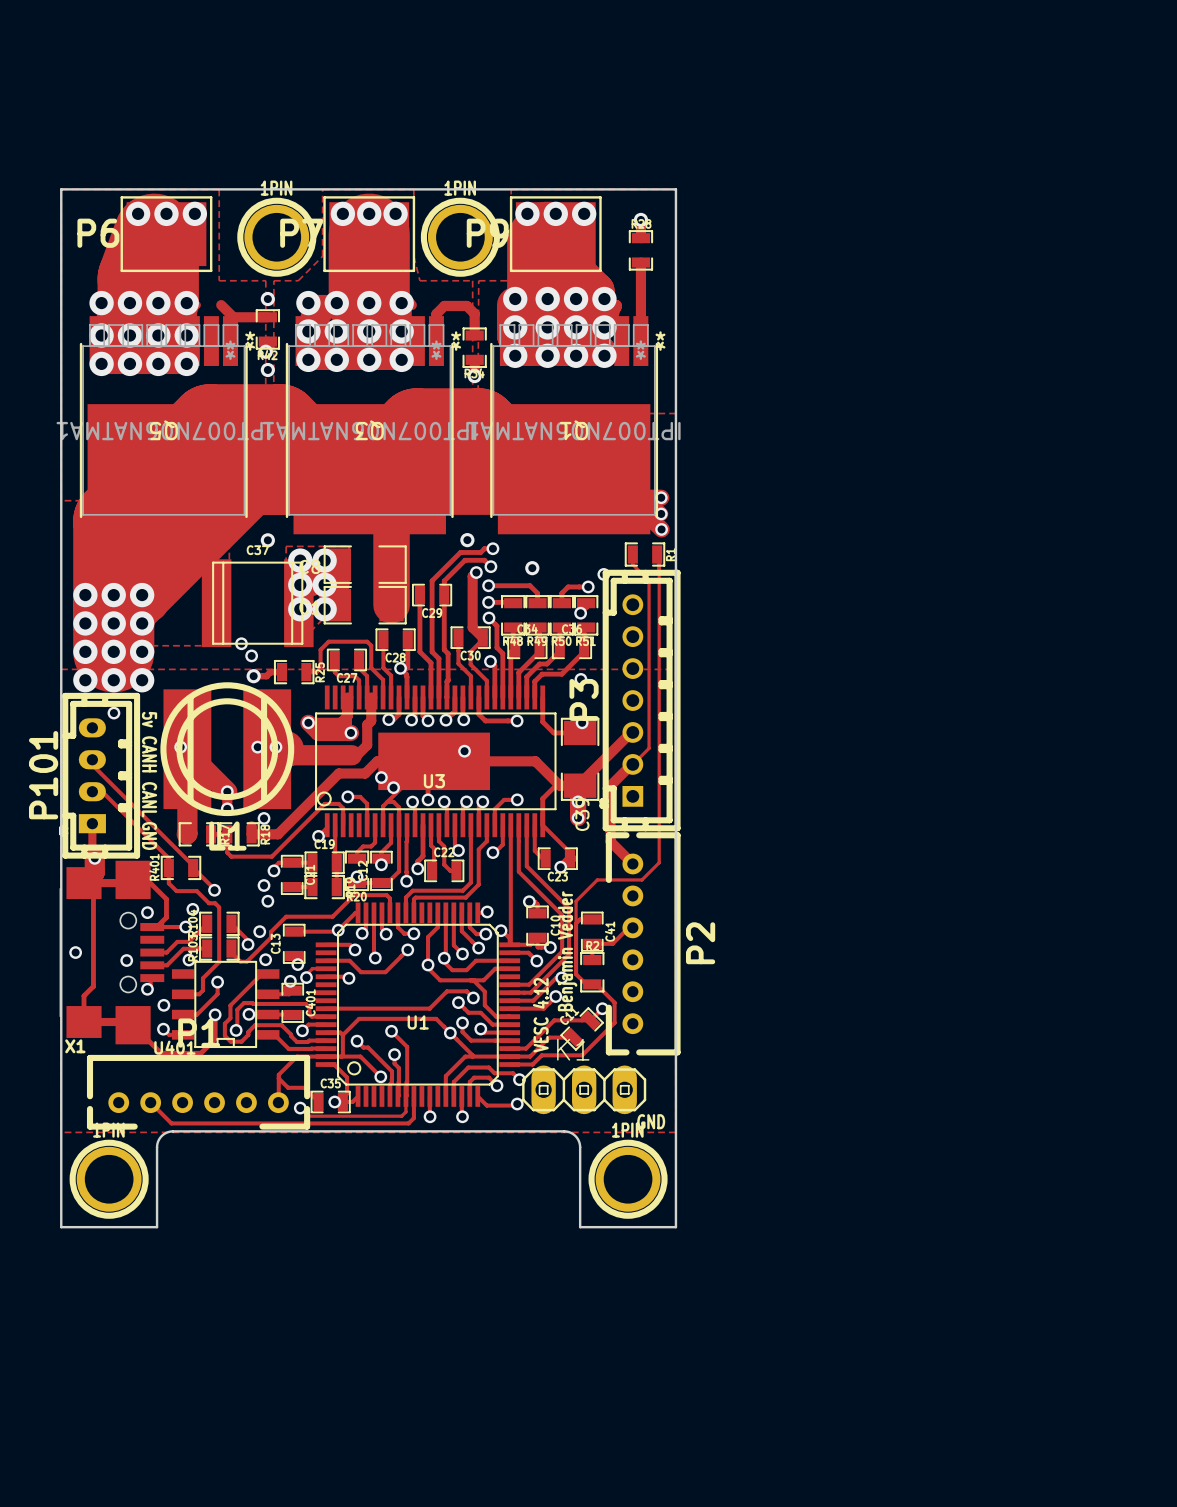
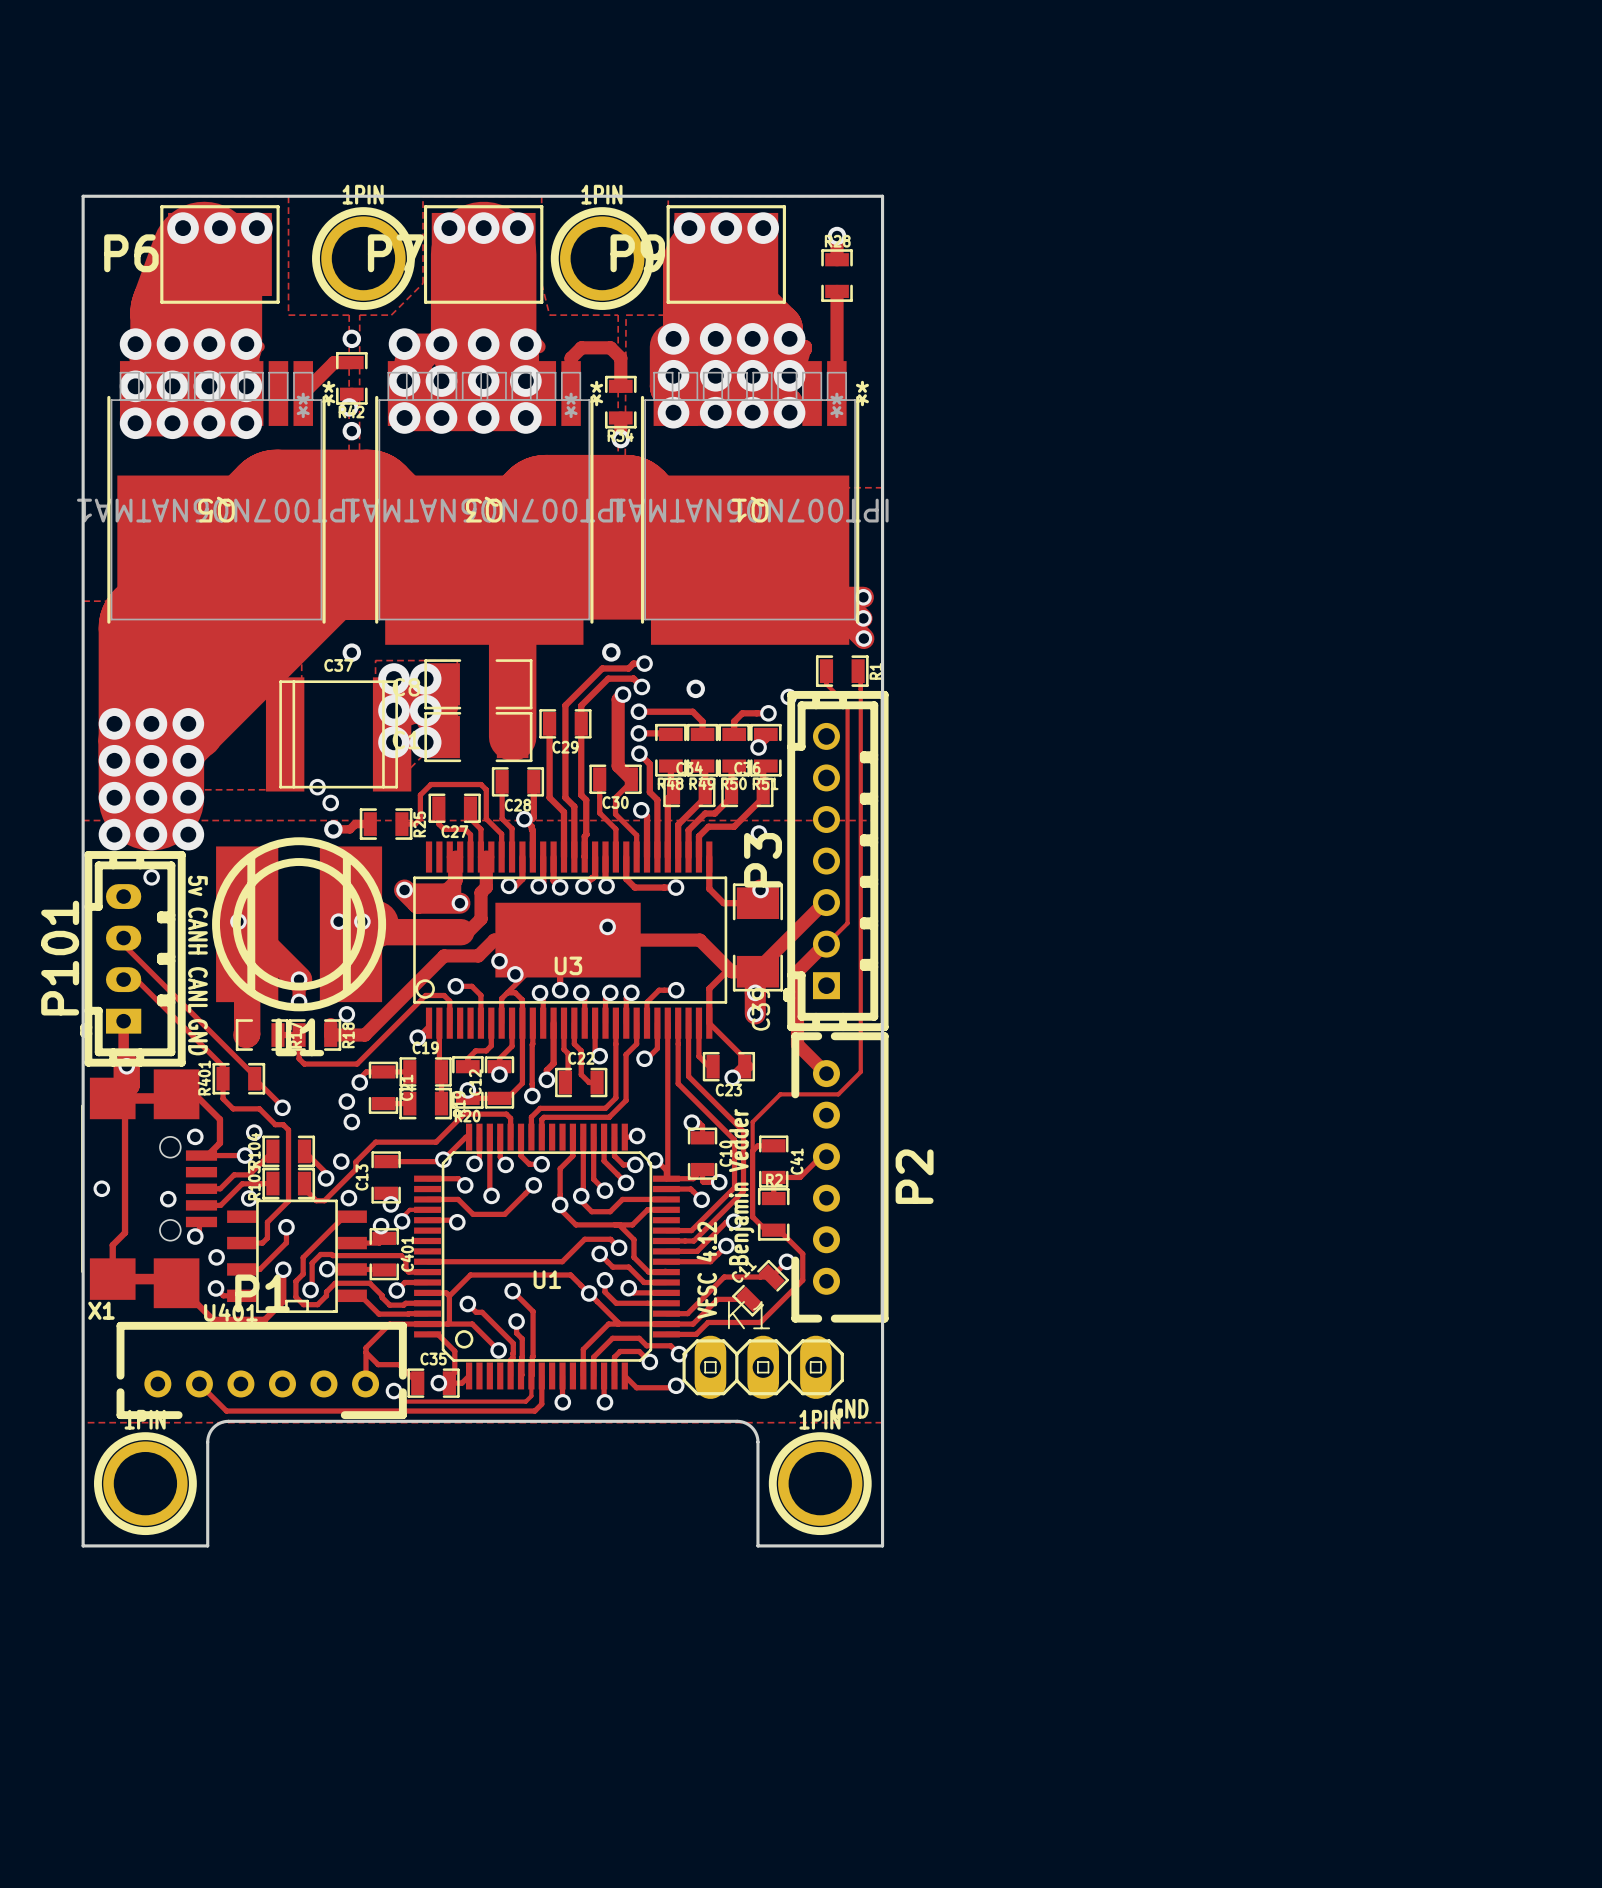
track: (221, 305) (233, 317) (254, 317) -> (303, 393) (334, 362)

